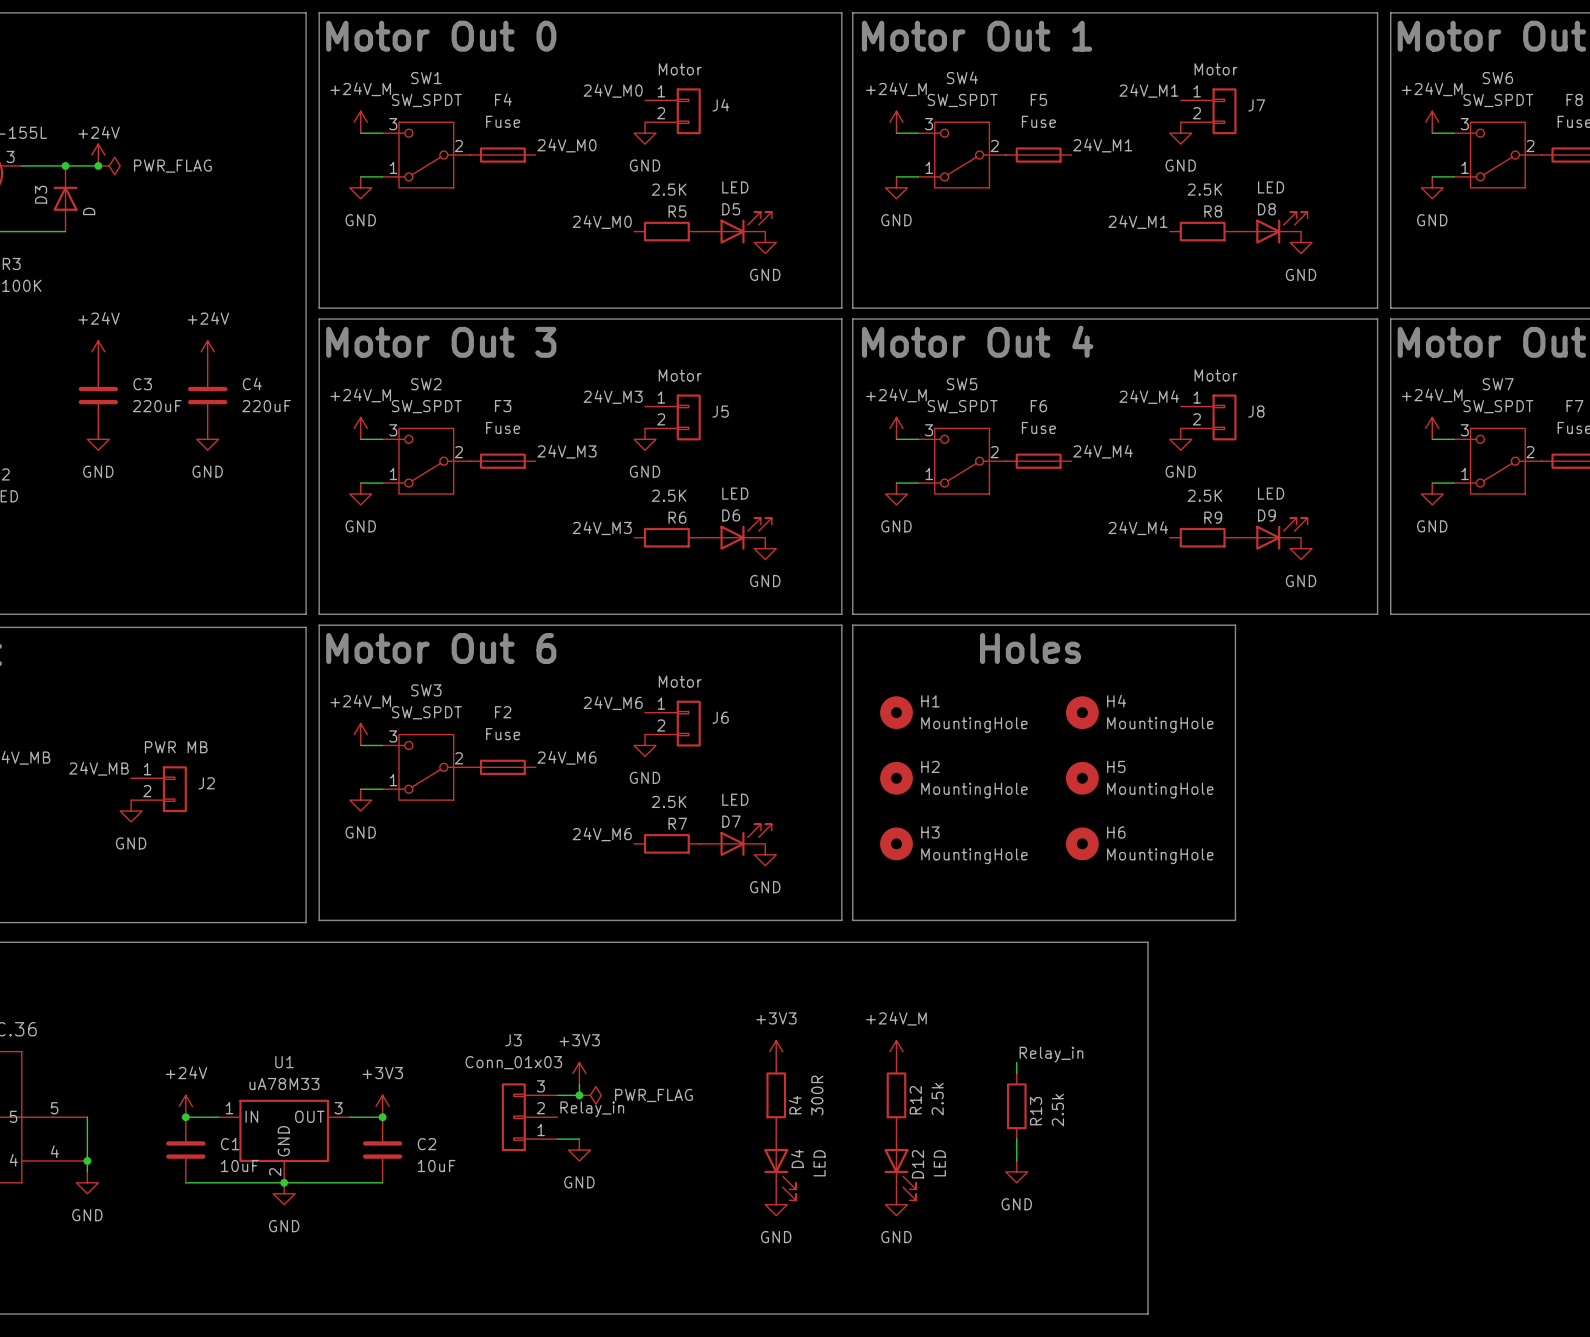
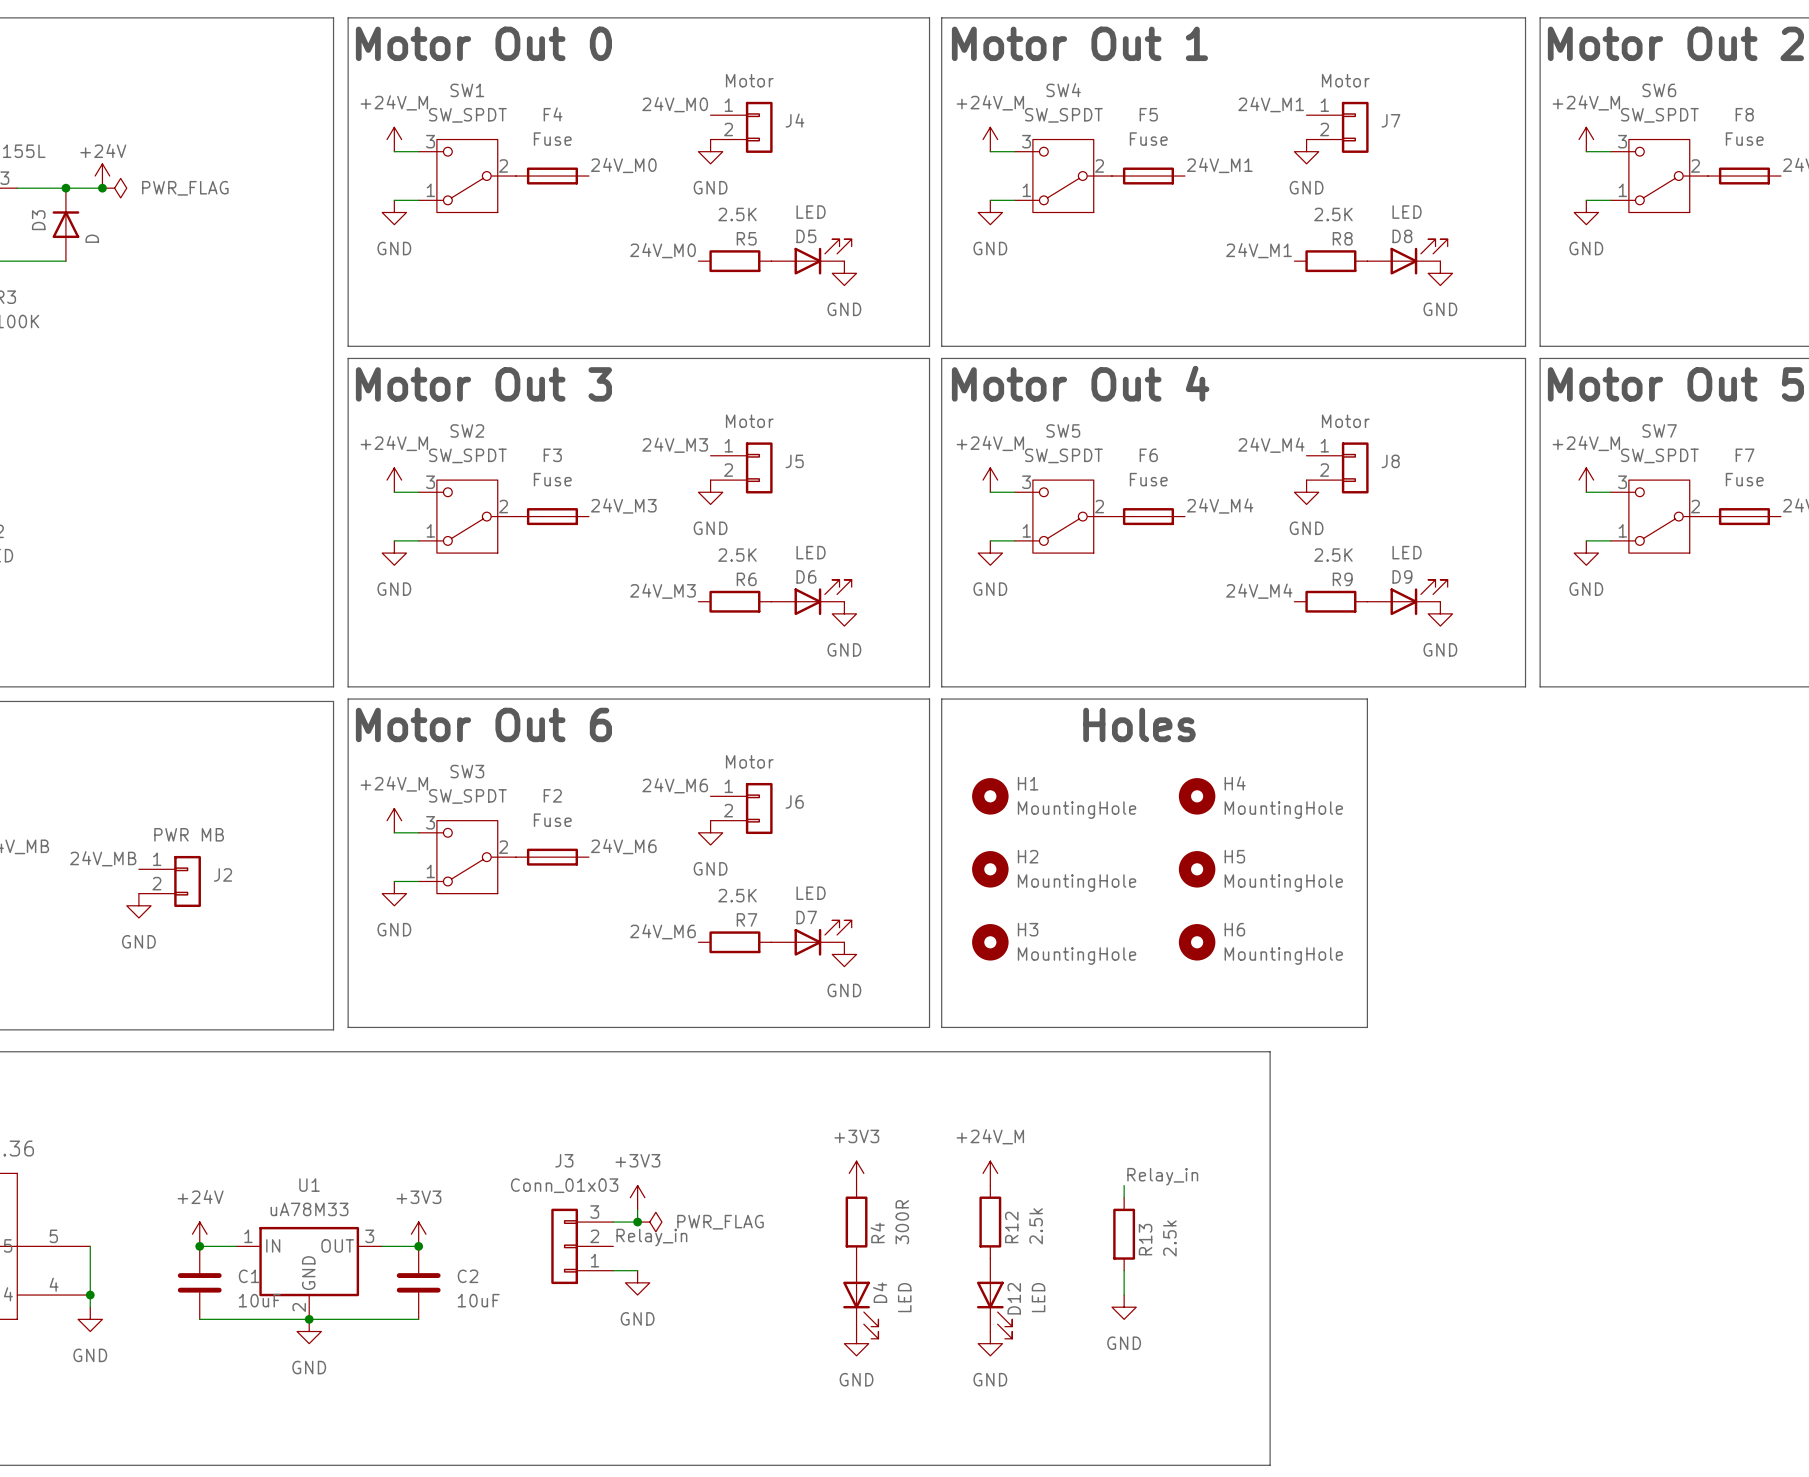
power symbol: +24V (98, 351) -> none
power symbol: +24V (207, 351) -> none
C3: 220uF (98, 395) -> none
C4: 220uF (207, 395) -> none
power symbol: GND (98, 439) -> none
power symbol: GND (207, 439) -> none

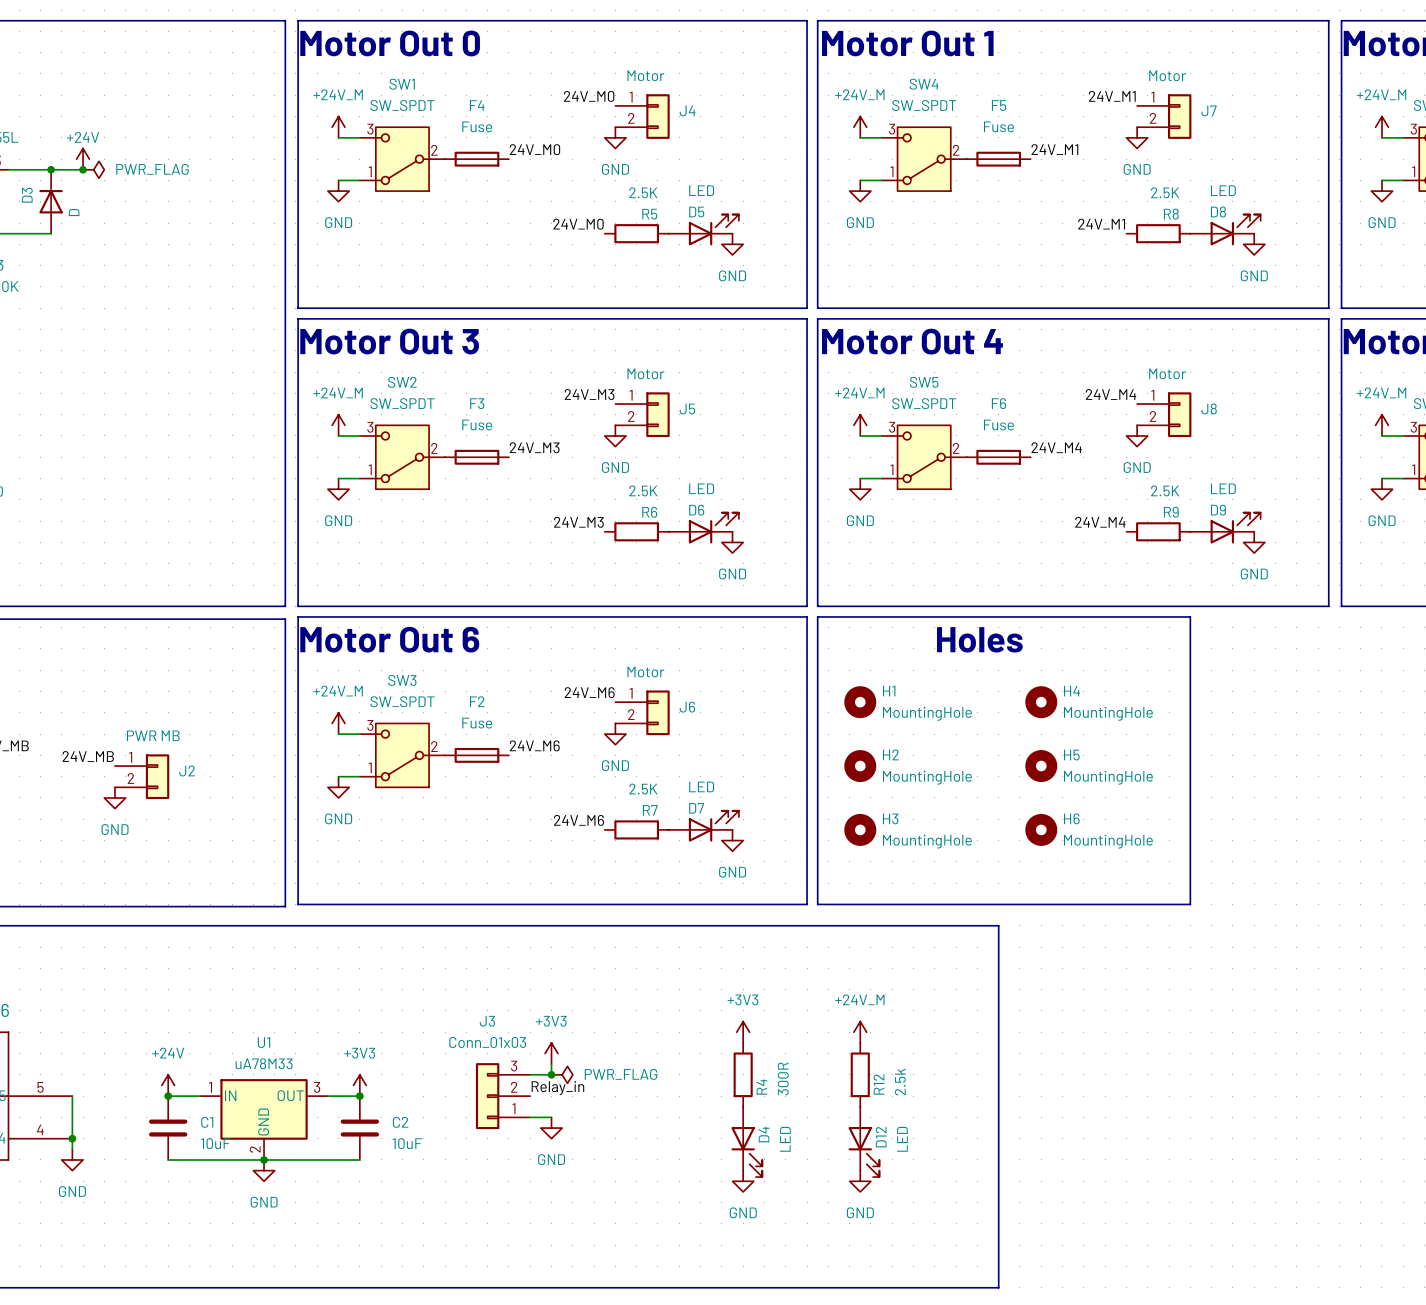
line: (1148, 1051) (1270, 1051) (1270, 1465) (1148, 1465) -> (998, 925) (998, 1287)
label: Relay_in (1162, 1176) -> none
wire: (1124, 1185) (1124, 1197) -> none
R13: 2.5k (1124, 1234) -> none
wire: (1124, 1270) (1124, 1295) -> none
power symbol: GND (1124, 1307) -> none

